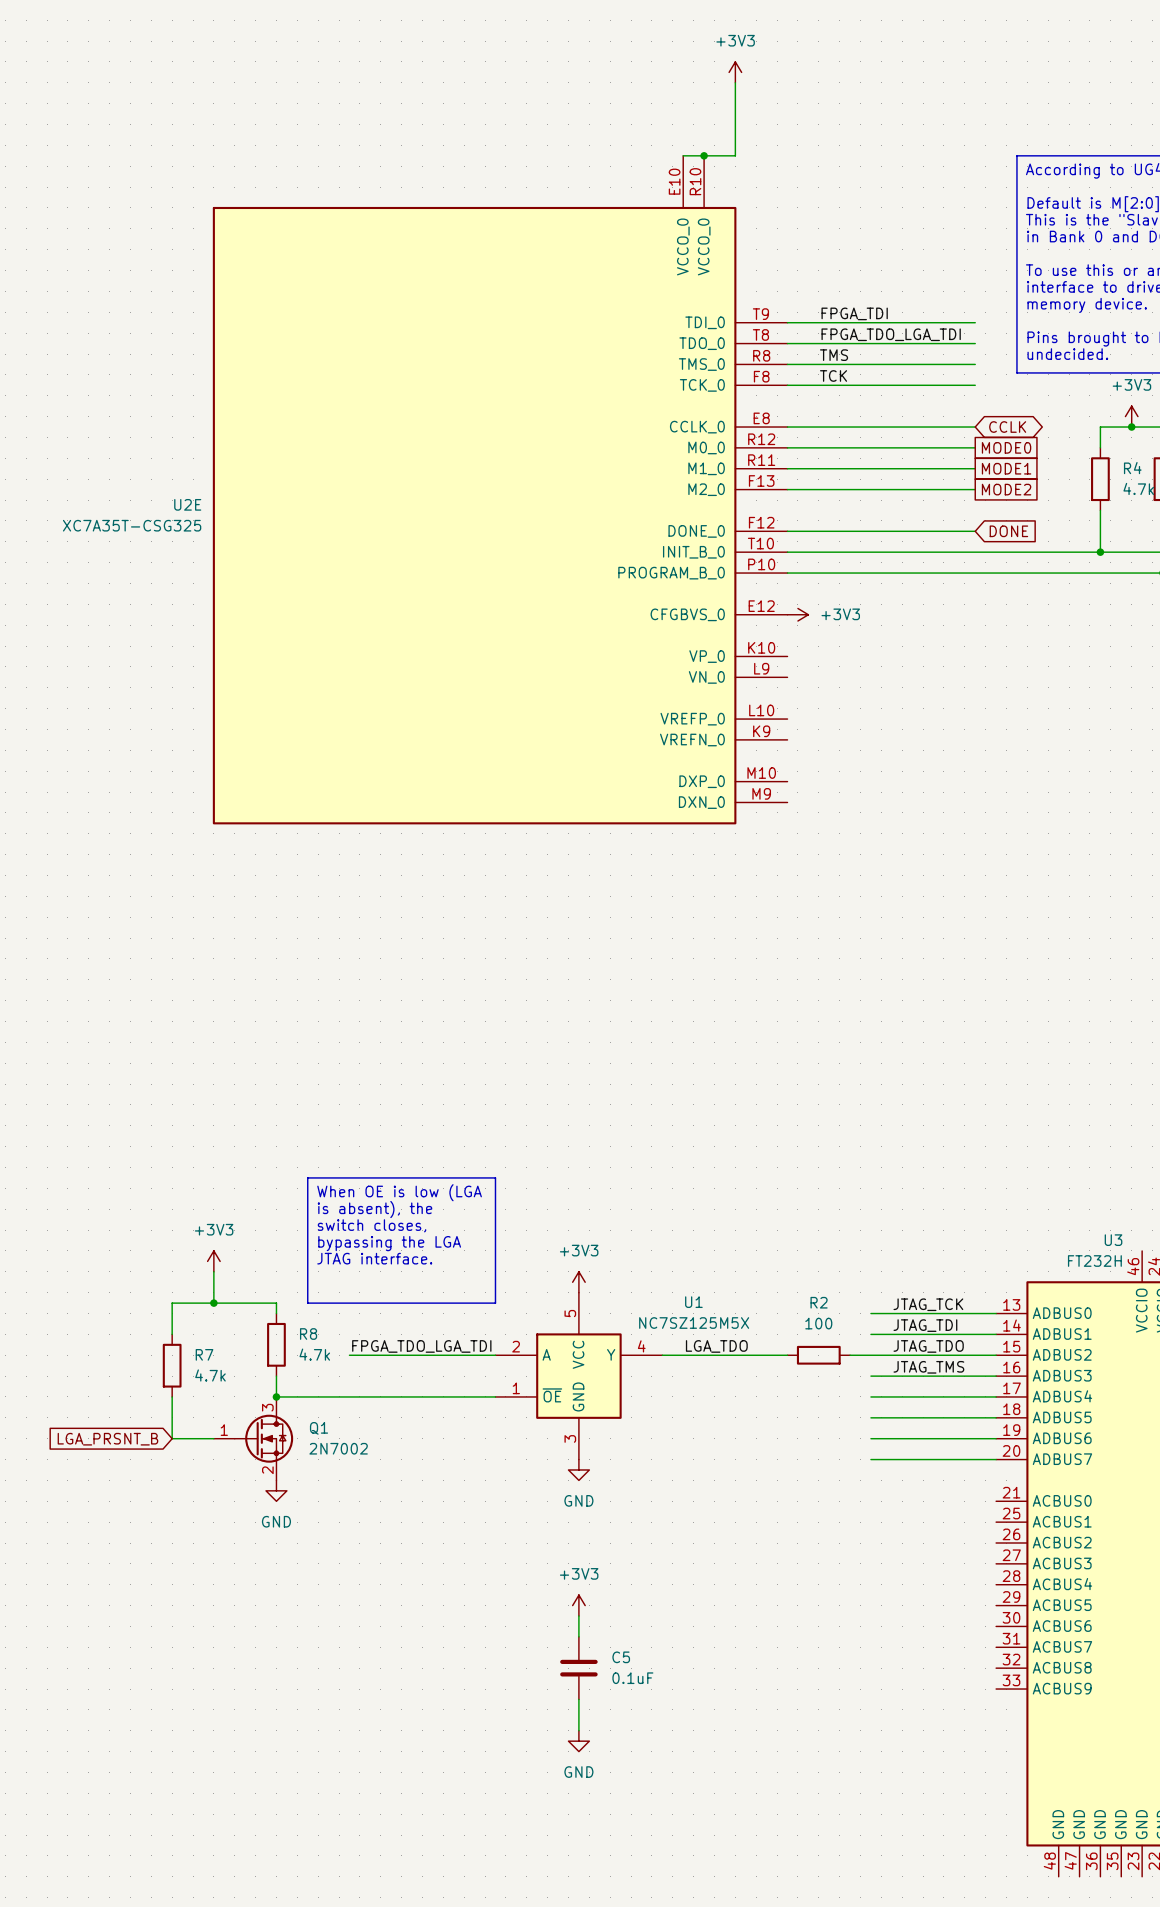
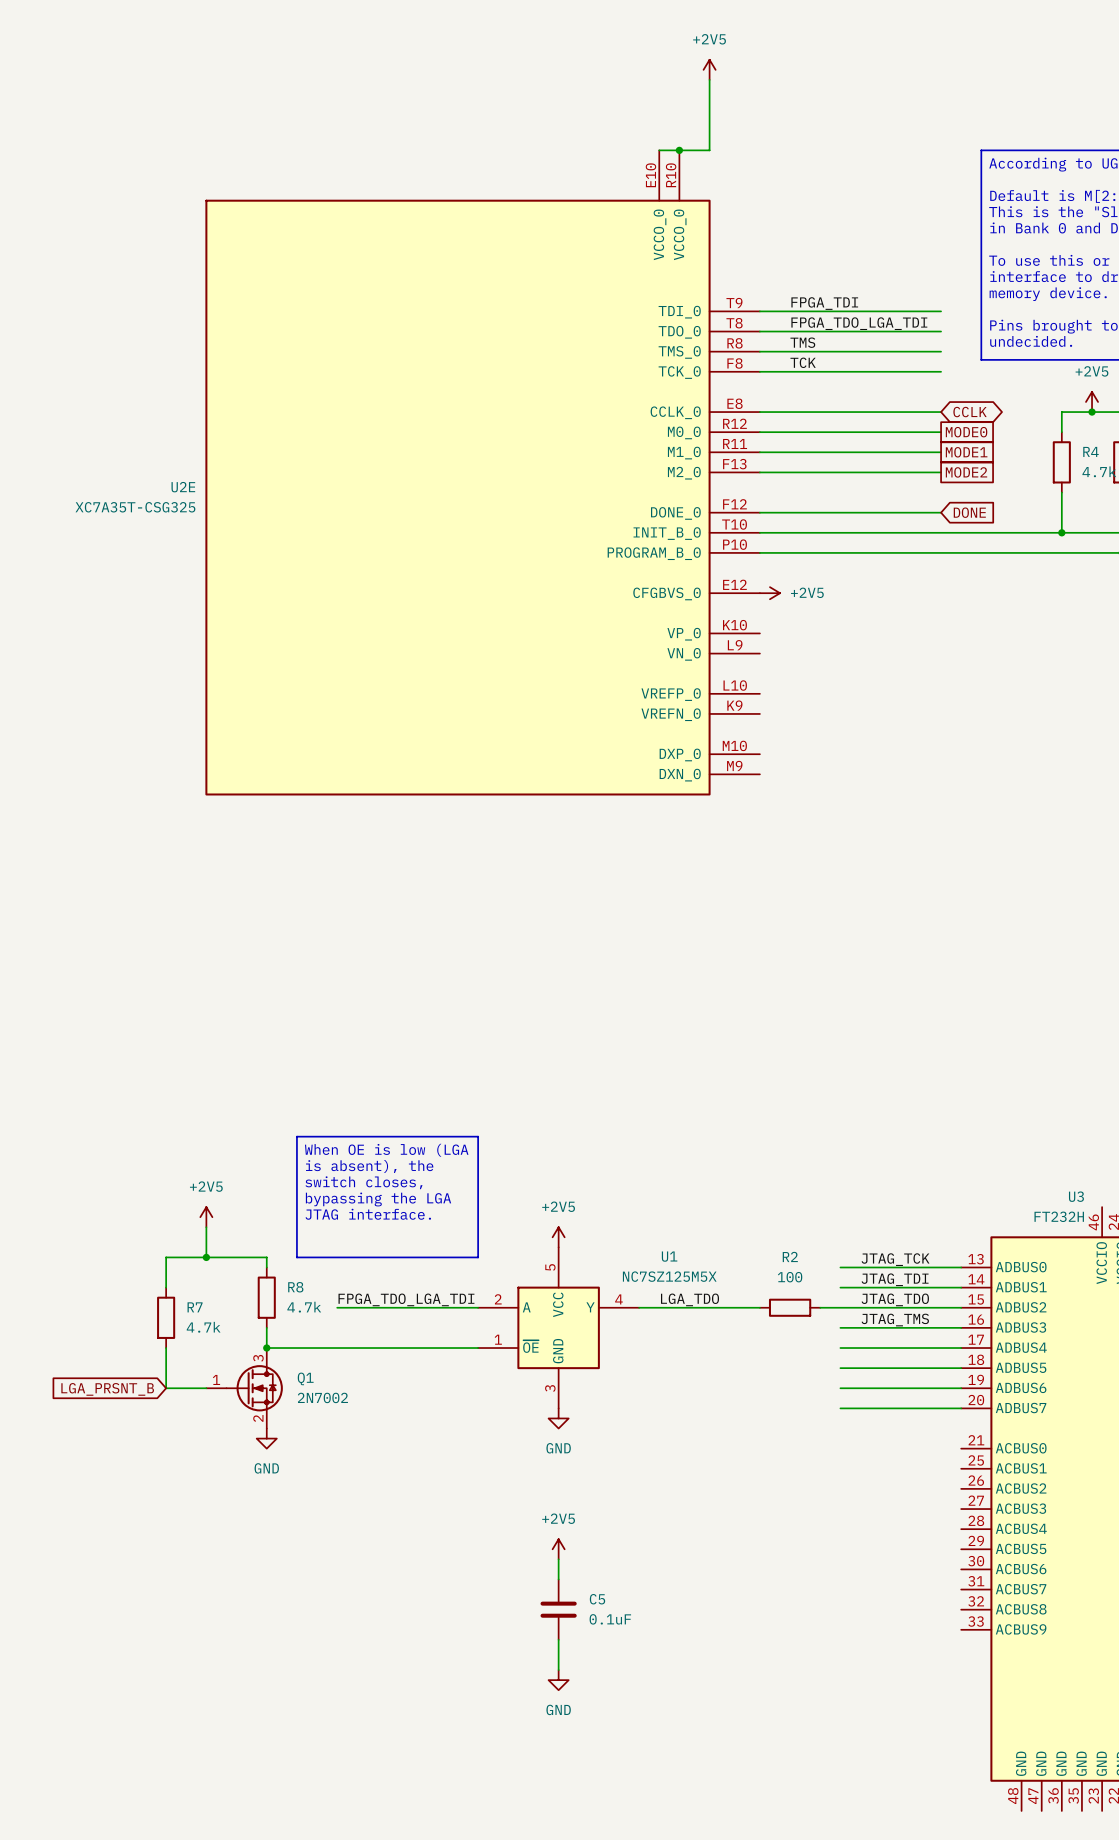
power symbol: +3V3 (735, 72) -> +2V5 (709, 69)
power symbol: +3V3 (1131, 416) -> +2V5 (1092, 401)
power symbol: +3V3 (797, 614) -> +2V5 (769, 593)
power symbol: +3V3 (213, 1261) -> +2V5 (206, 1217)
power symbol: +3V3 (578, 1282) -> +2V5 (558, 1237)
power symbol: +3V3 (578, 1605) -> +2V5 (558, 1549)

